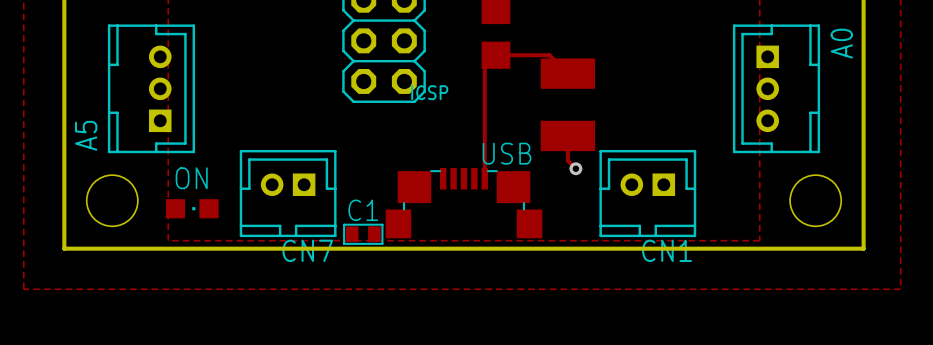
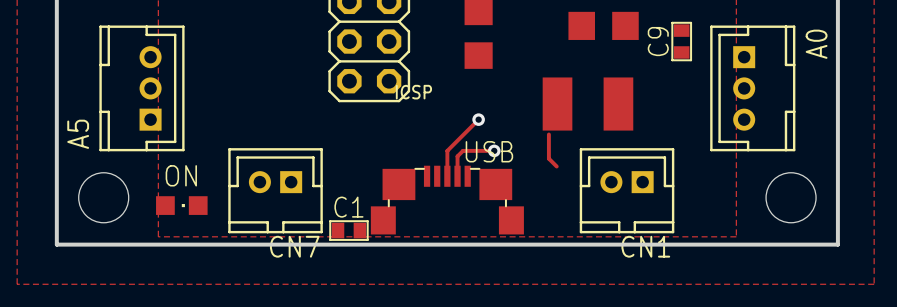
part: none -> (603, 25)
C9: none -> (681, 41)
track: (567, 73) (549, 55) (495, 55) (484, 66) (484, 178) -> none
part rotation: 0° (567, 104) -> 90° clockwise (587, 104)
track: none -> (478, 119) (447, 150) (447, 176)
via: none -> (478, 119)
track: none -> (494, 150) (463, 150) (457, 156) (457, 176)
via: none -> (494, 150)
via: (575, 168) -> none

